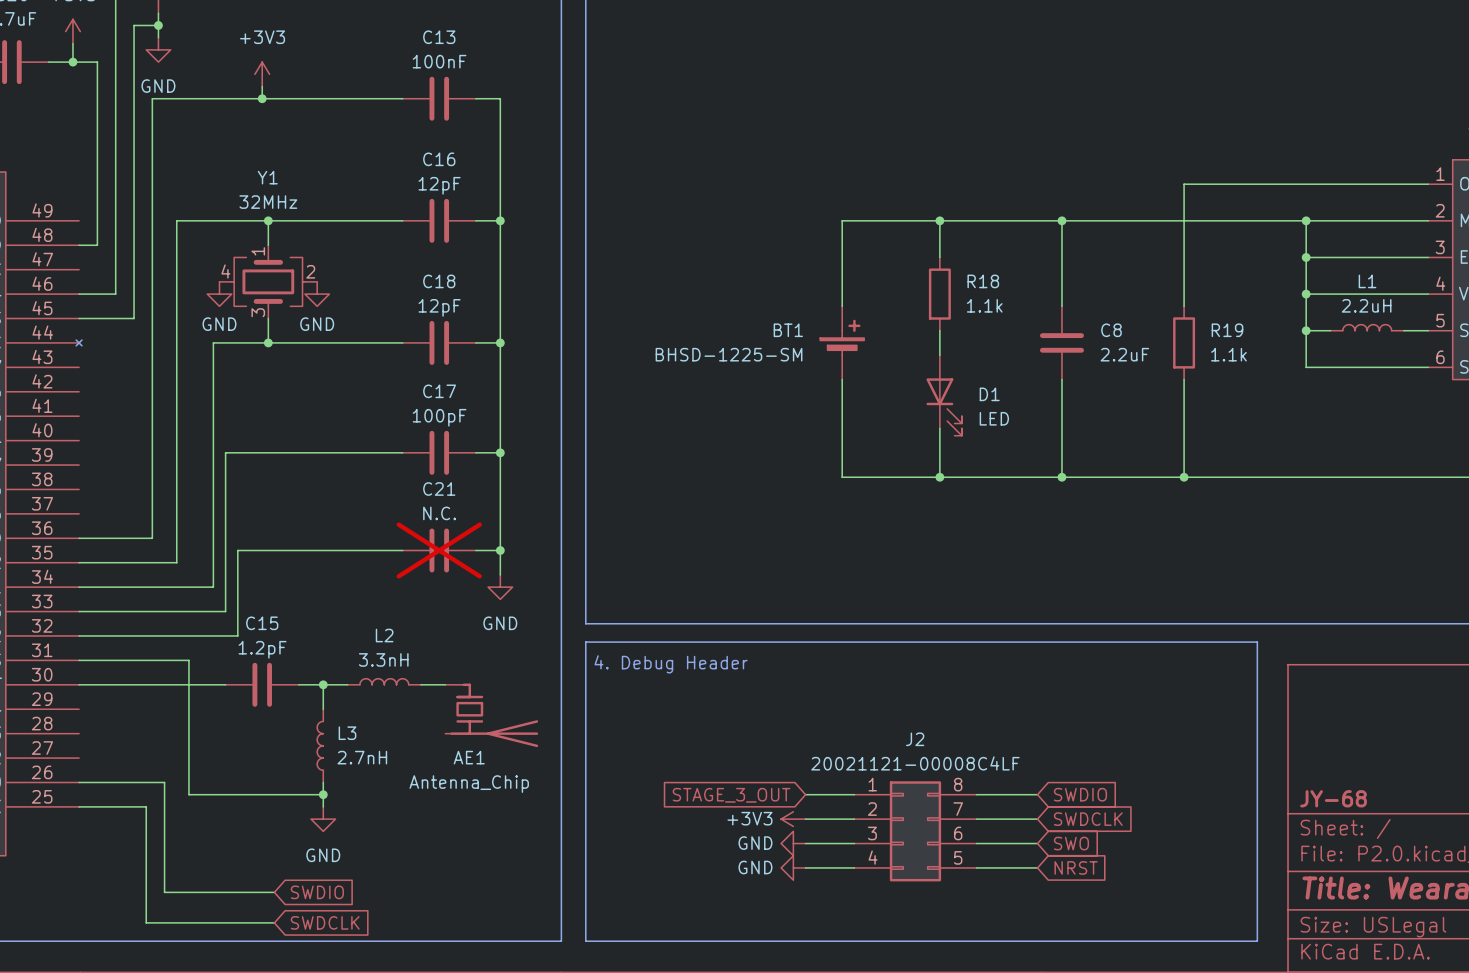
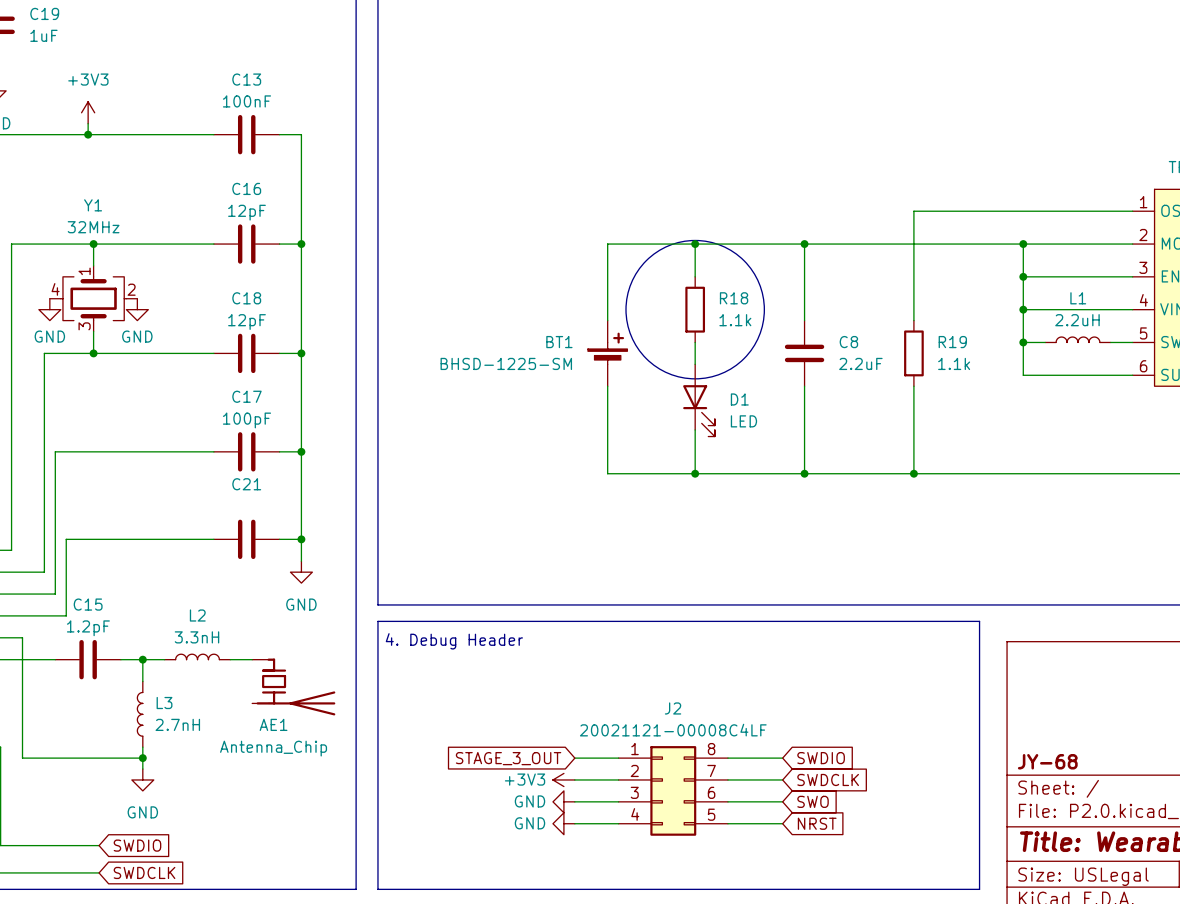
drawing: none -> [626, 240, 765, 379]
C21 value: N.C. (439, 513) -> none
C21 do-not-place cross: (439, 550) -> none

